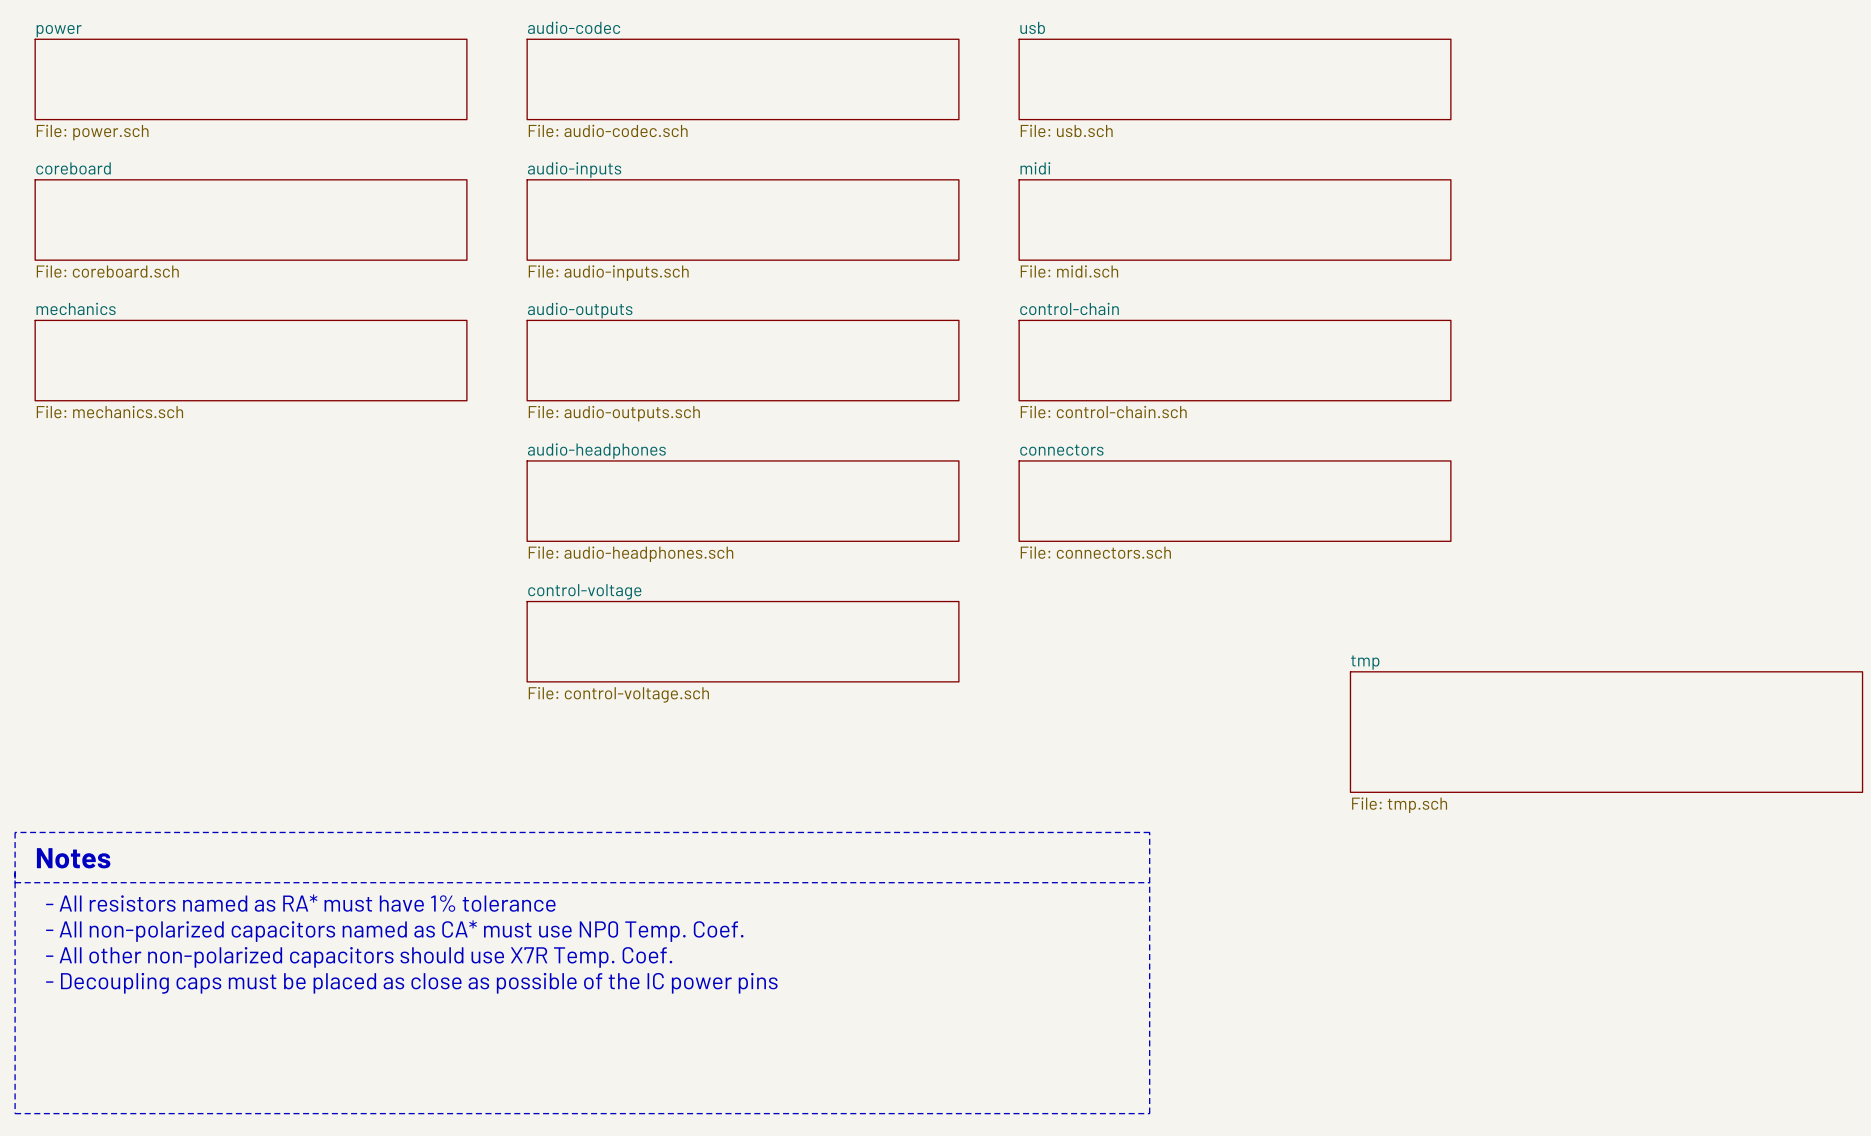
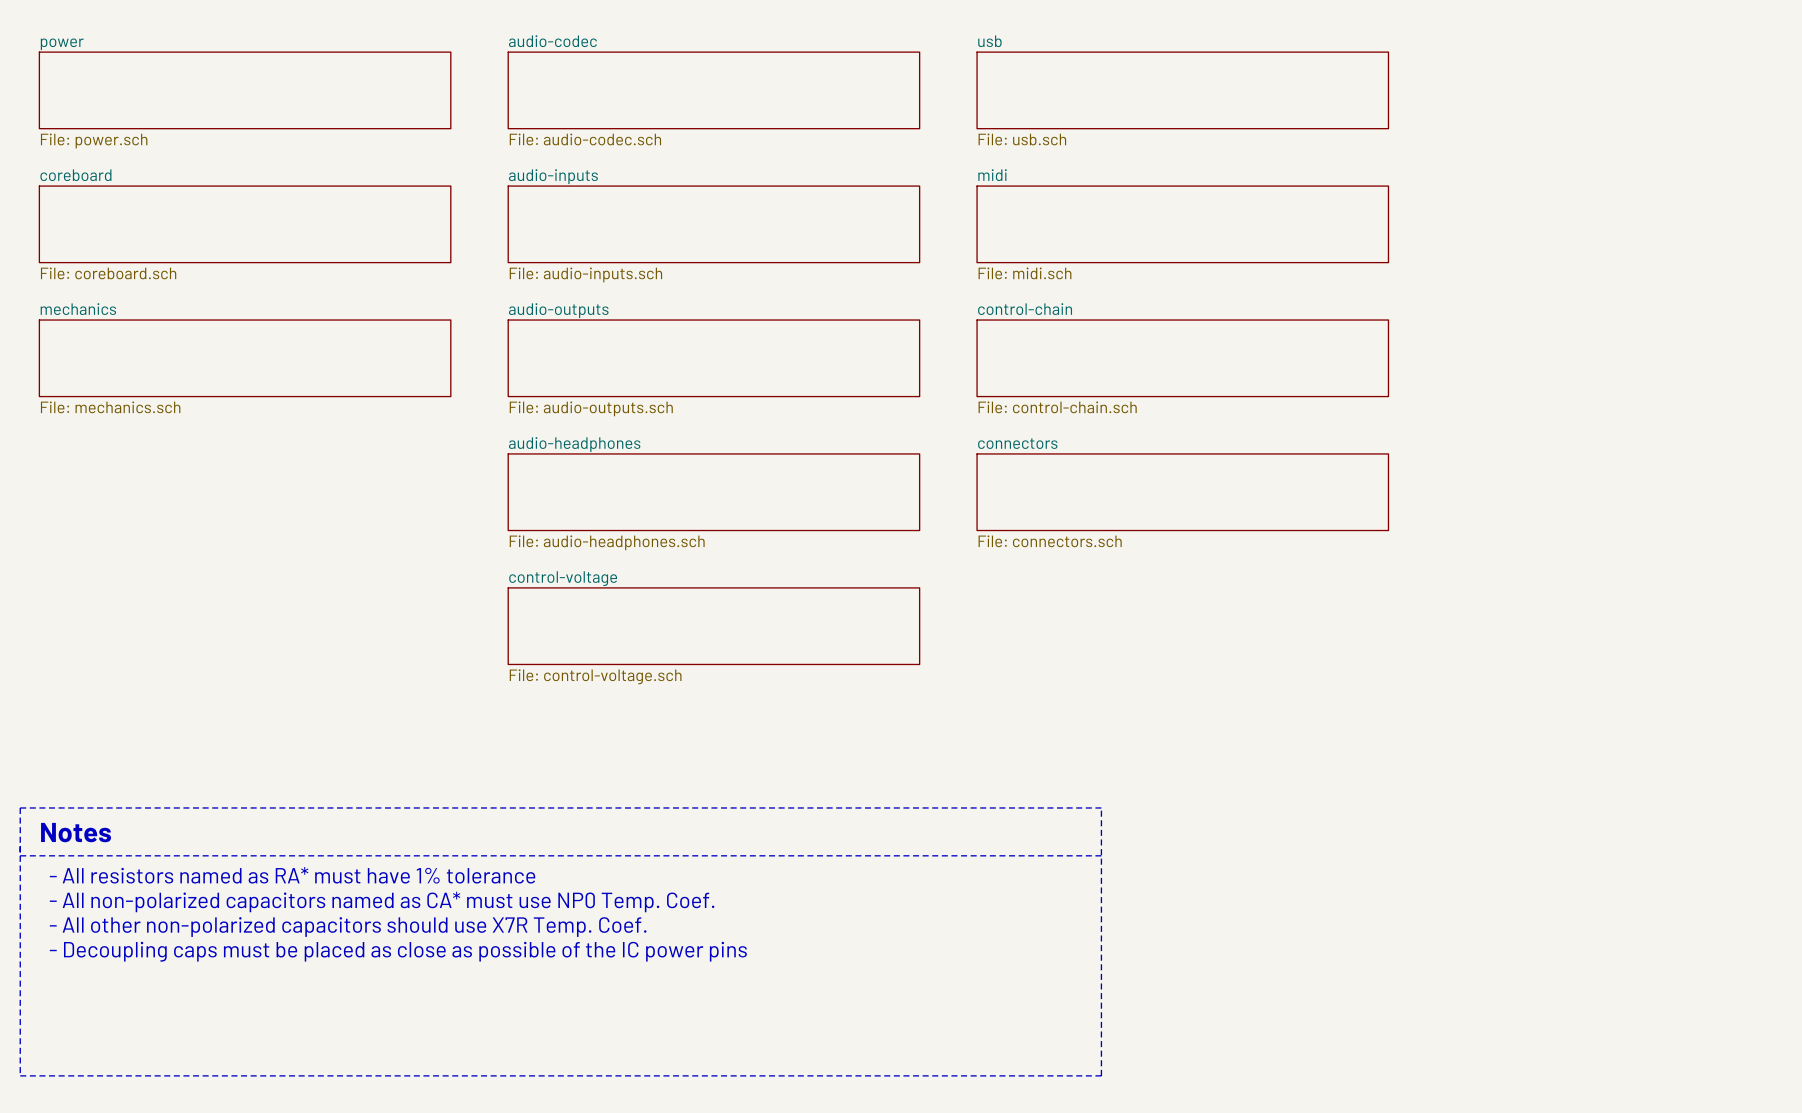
sheet tmp: File: tmp.sch (1606, 732) -> none

